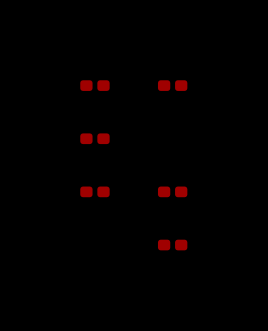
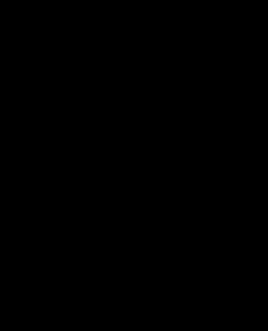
part: (94, 85) -> none
part: (172, 85) -> none
part: (94, 138) -> none
part: (94, 191) -> none
part: (172, 191) -> none
part: (172, 245) -> none

